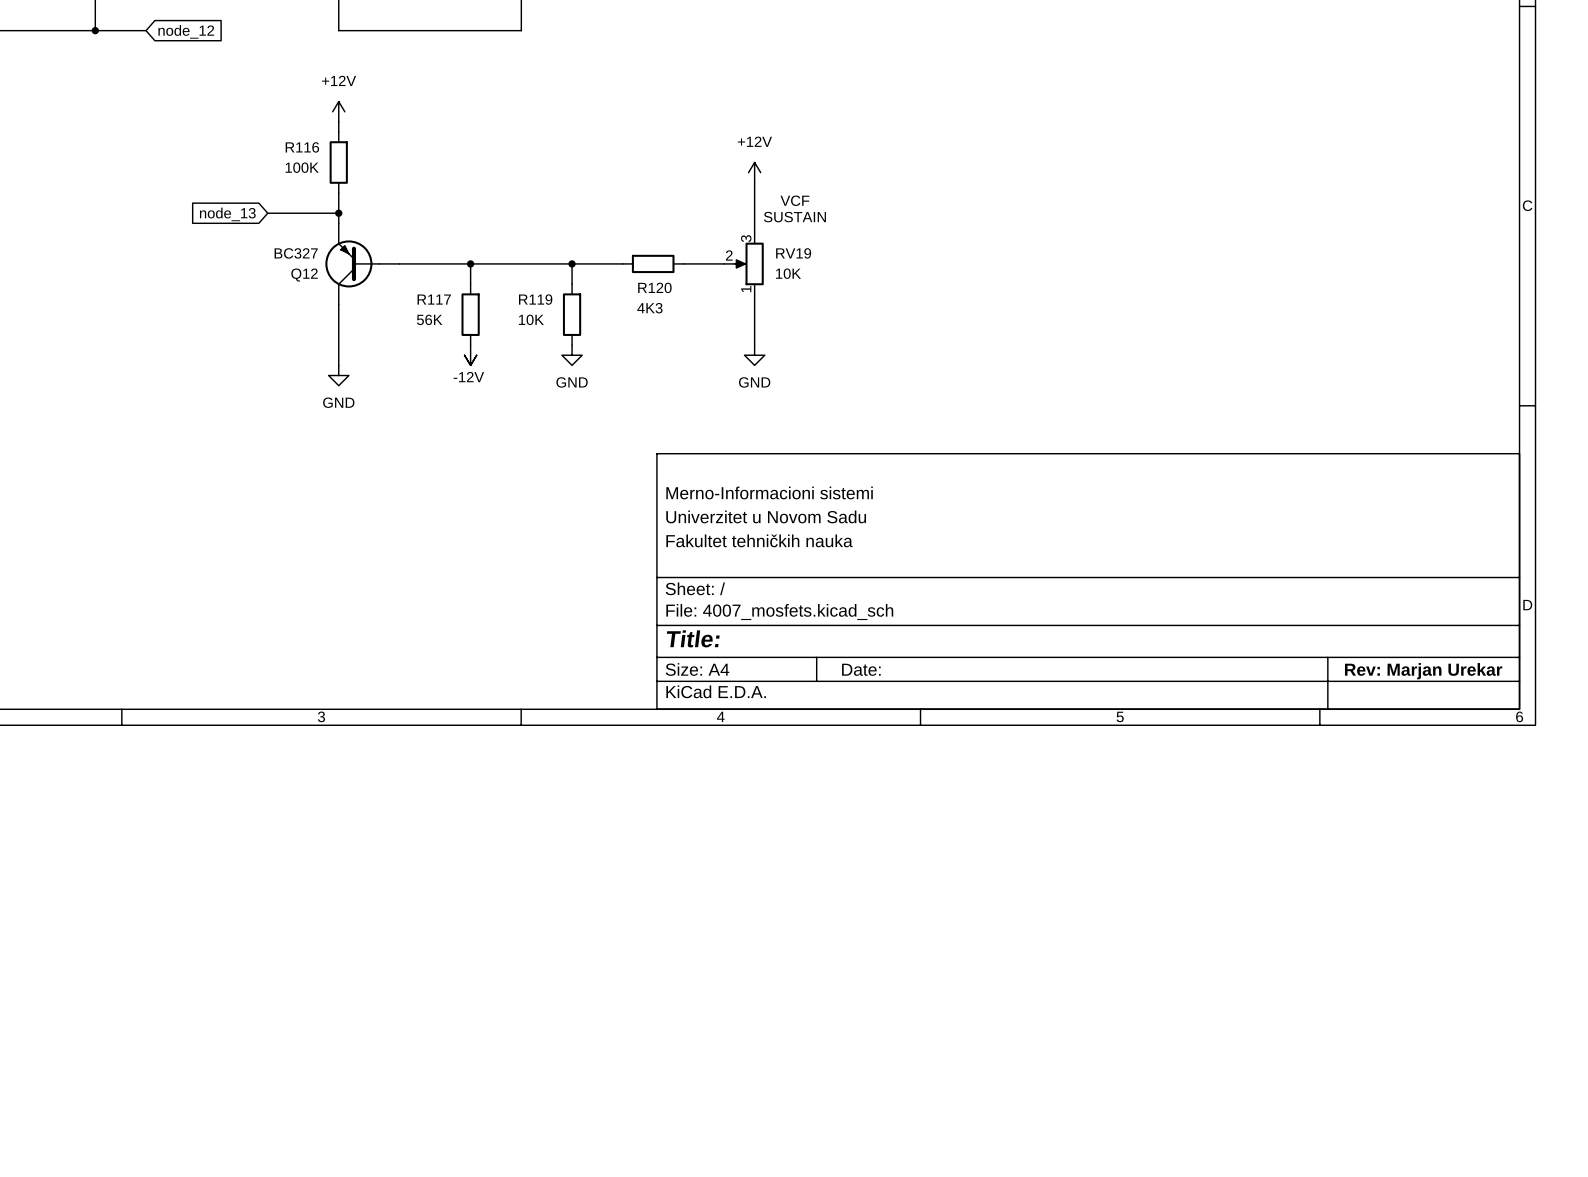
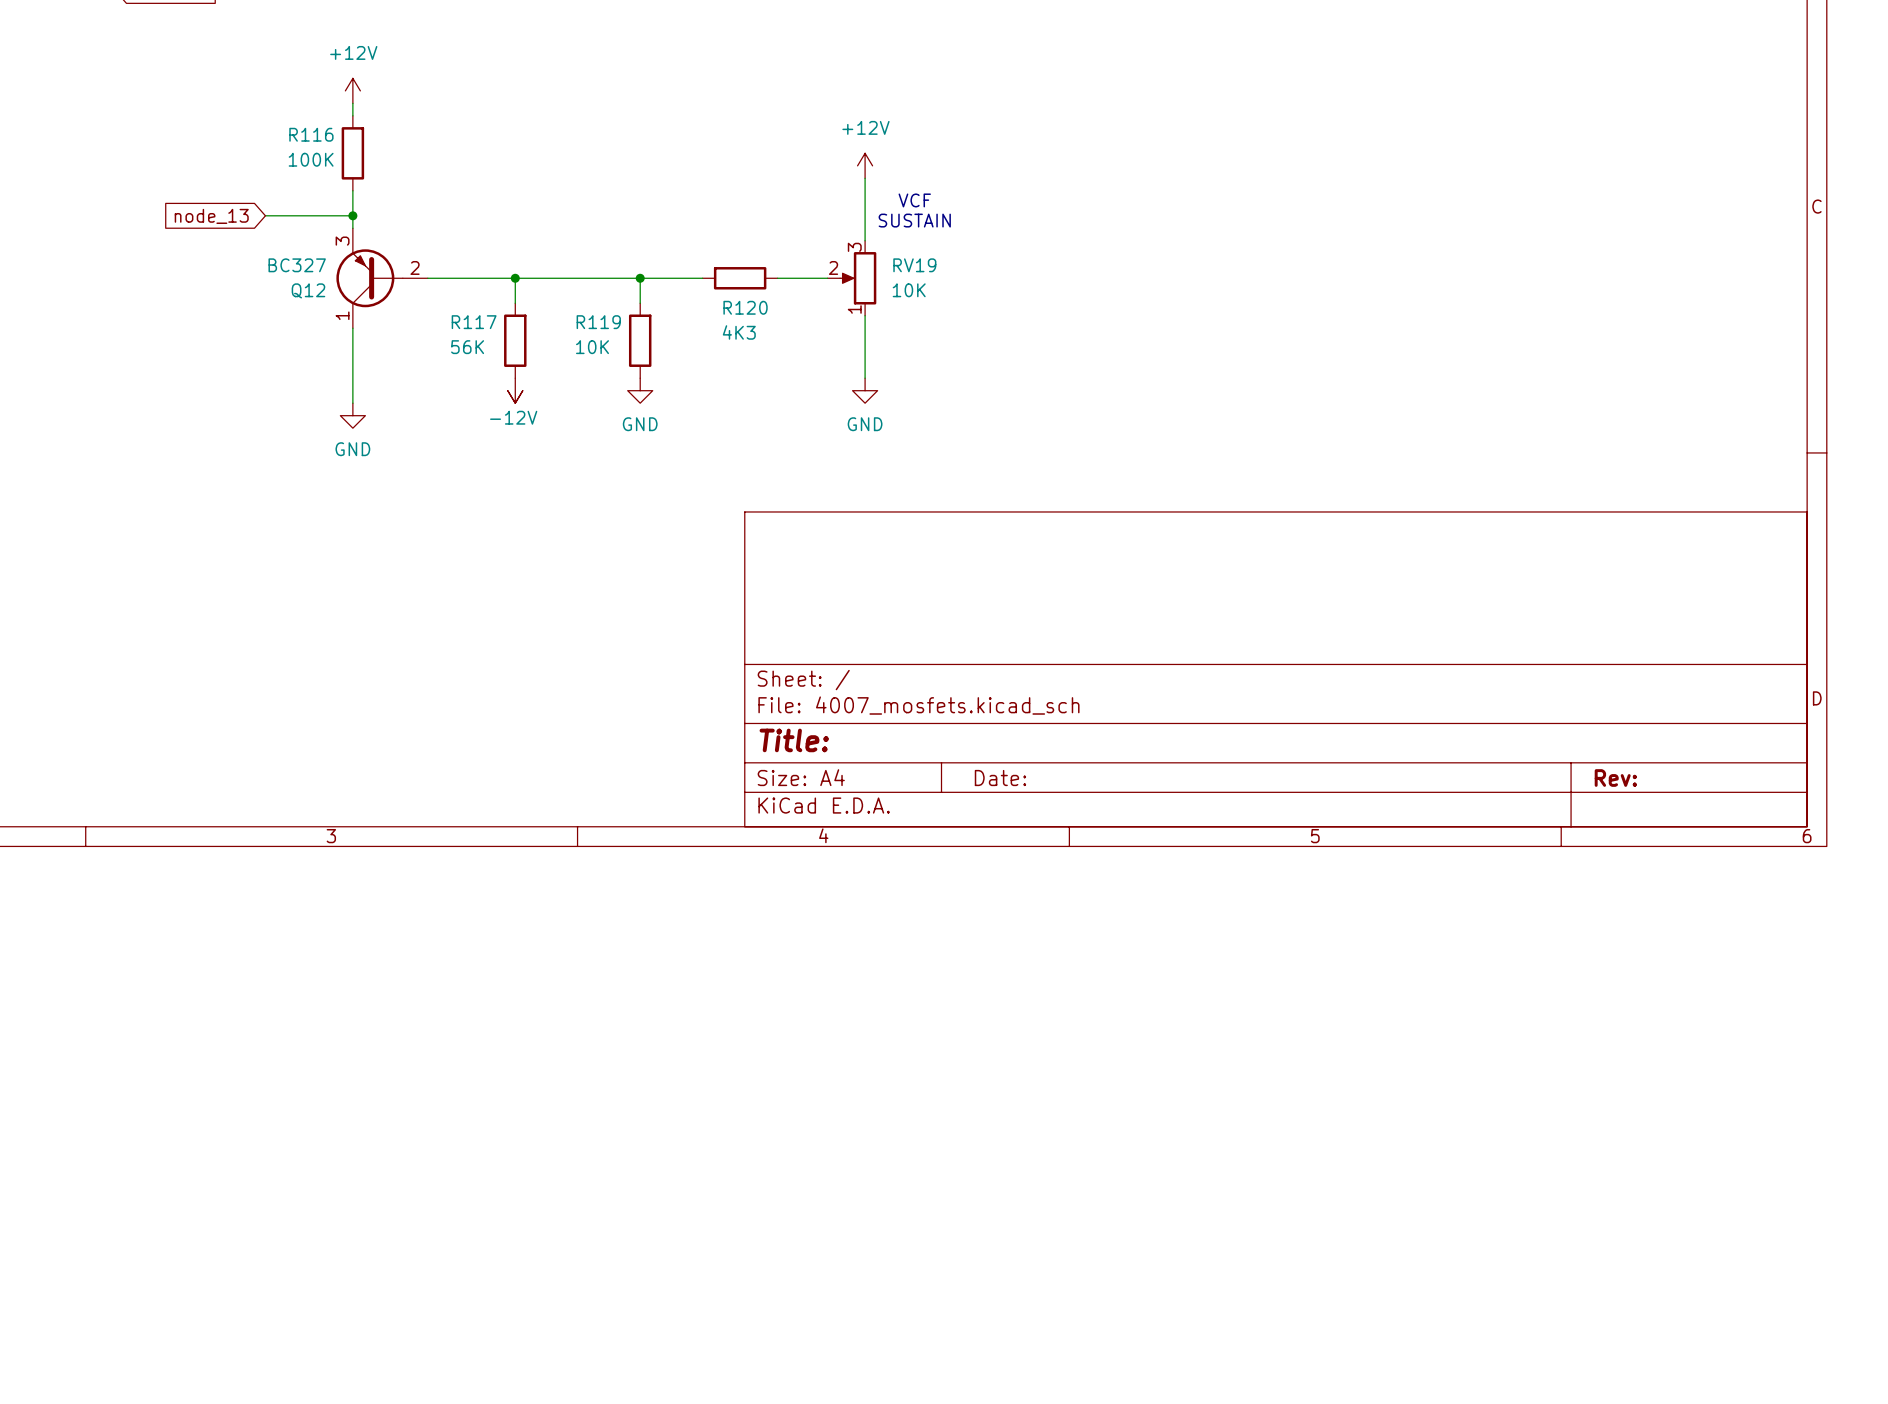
Q12 pin number: none -> 3 (342, 241)
Q12 pin number: none -> 2 (415, 267)
Q12 pin number: none -> 1 (342, 315)
title block: Merno-Informacioni sistemi (769, 492) -> none
title block: Univerzitet u Novom Sadu (766, 516) -> none
title block: Fakultet tehničkih nauka (759, 540) -> none
title block: Rev: Marjan Urekar (1423, 671) -> Rev: (1615, 778)

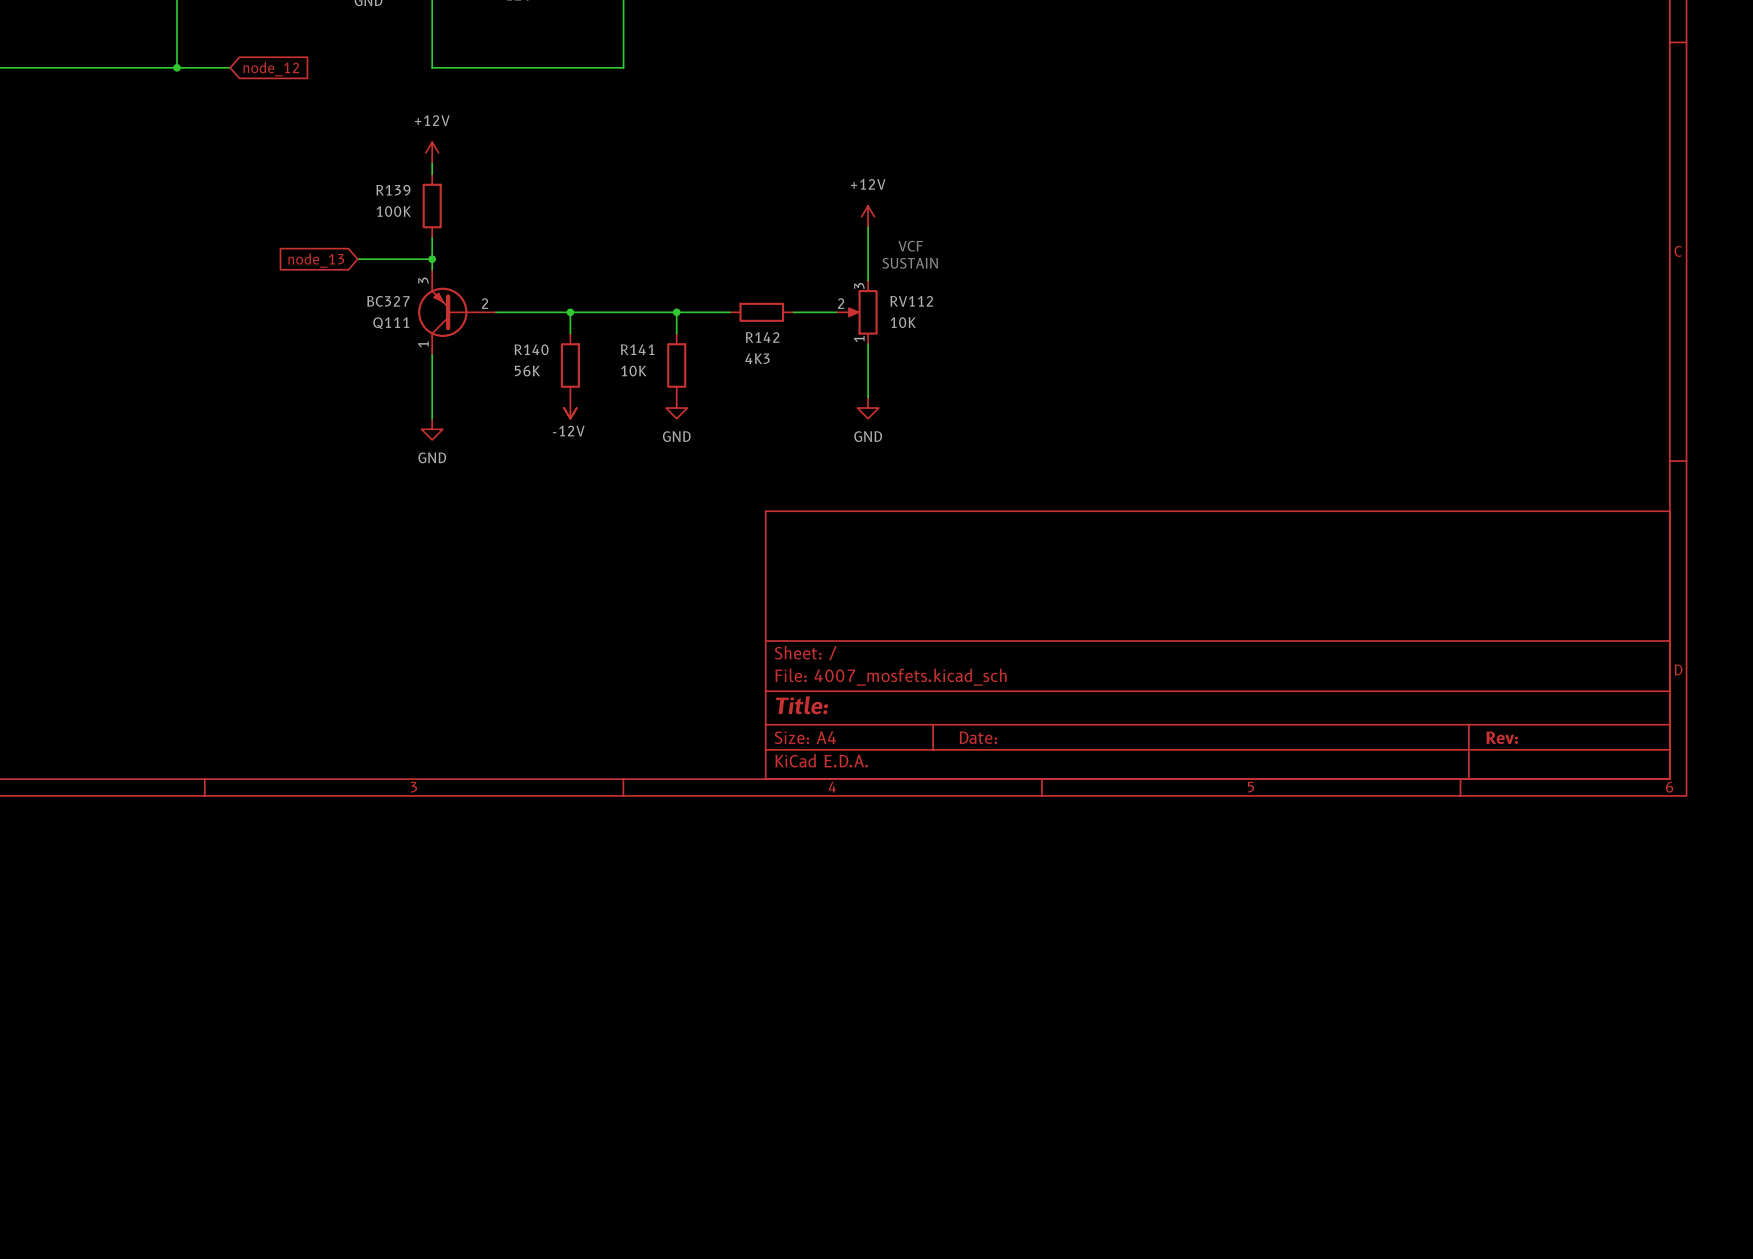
R116 name: R116 (311, 134) -> R139 (393, 190)
RV19 name: RV19 (914, 265) -> RV112 (911, 301)
Q12 name: Q12 (308, 290) -> Q111 (391, 323)
R120 name: R120 (745, 307) -> R142 (762, 337)
R117 name: R117 (474, 322) -> R140 (531, 349)
R119 name: R119 (598, 322) -> R141 (637, 349)

